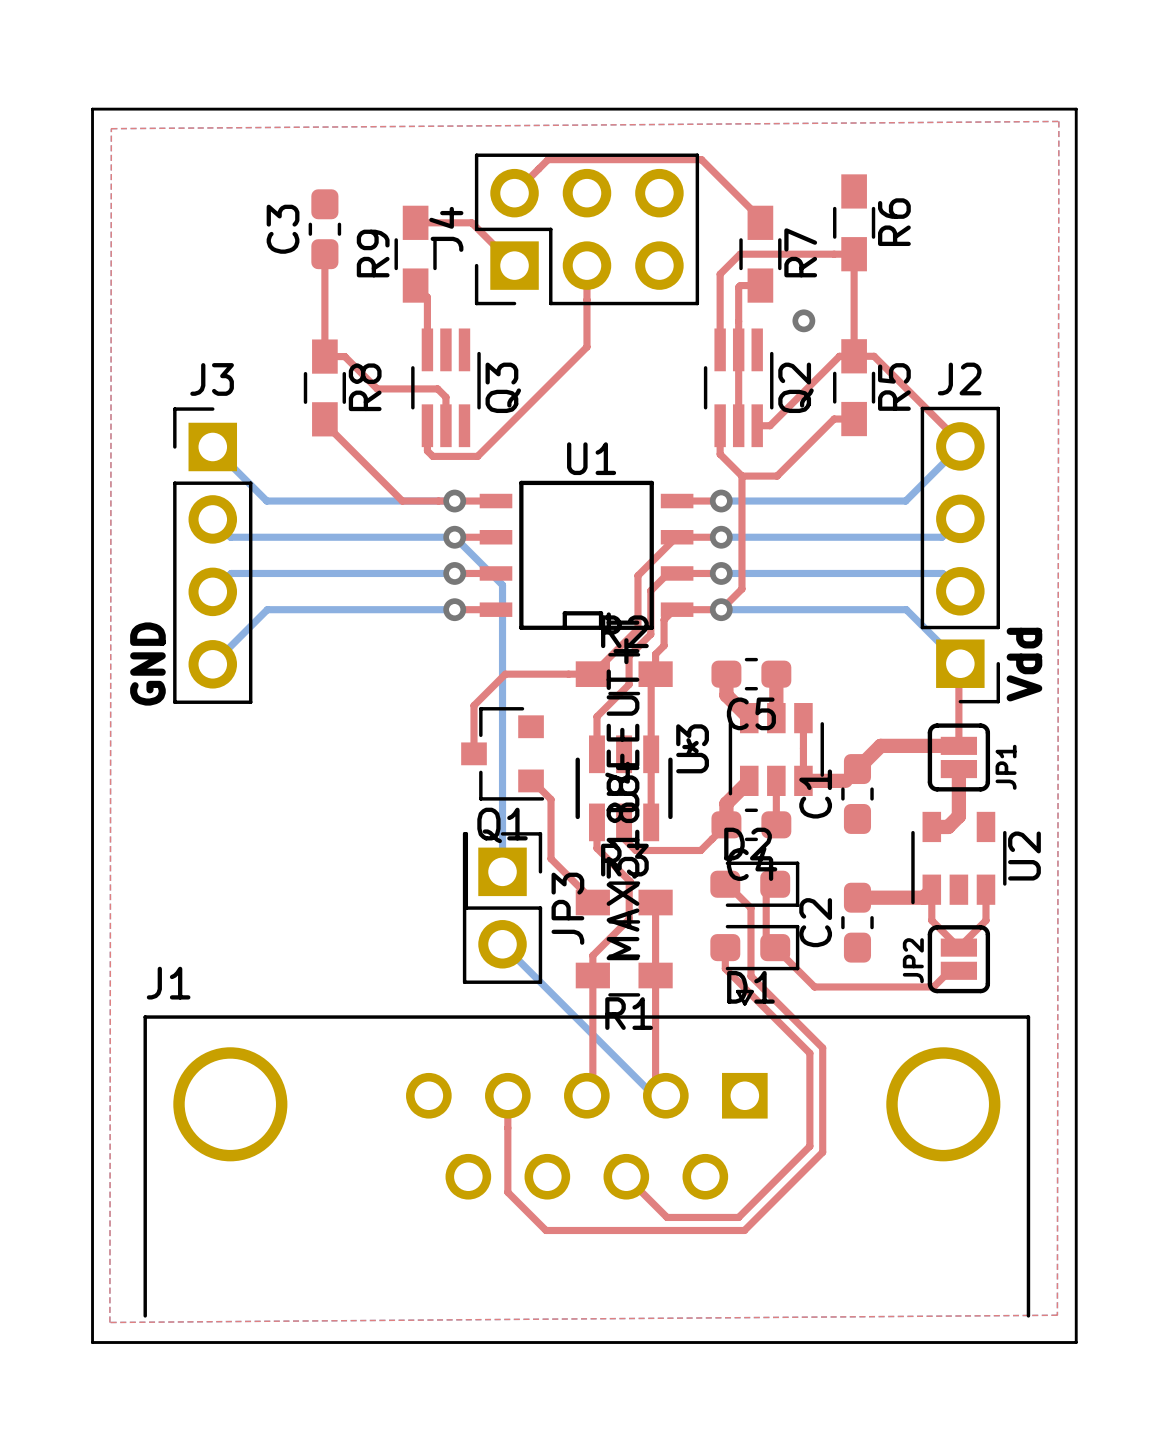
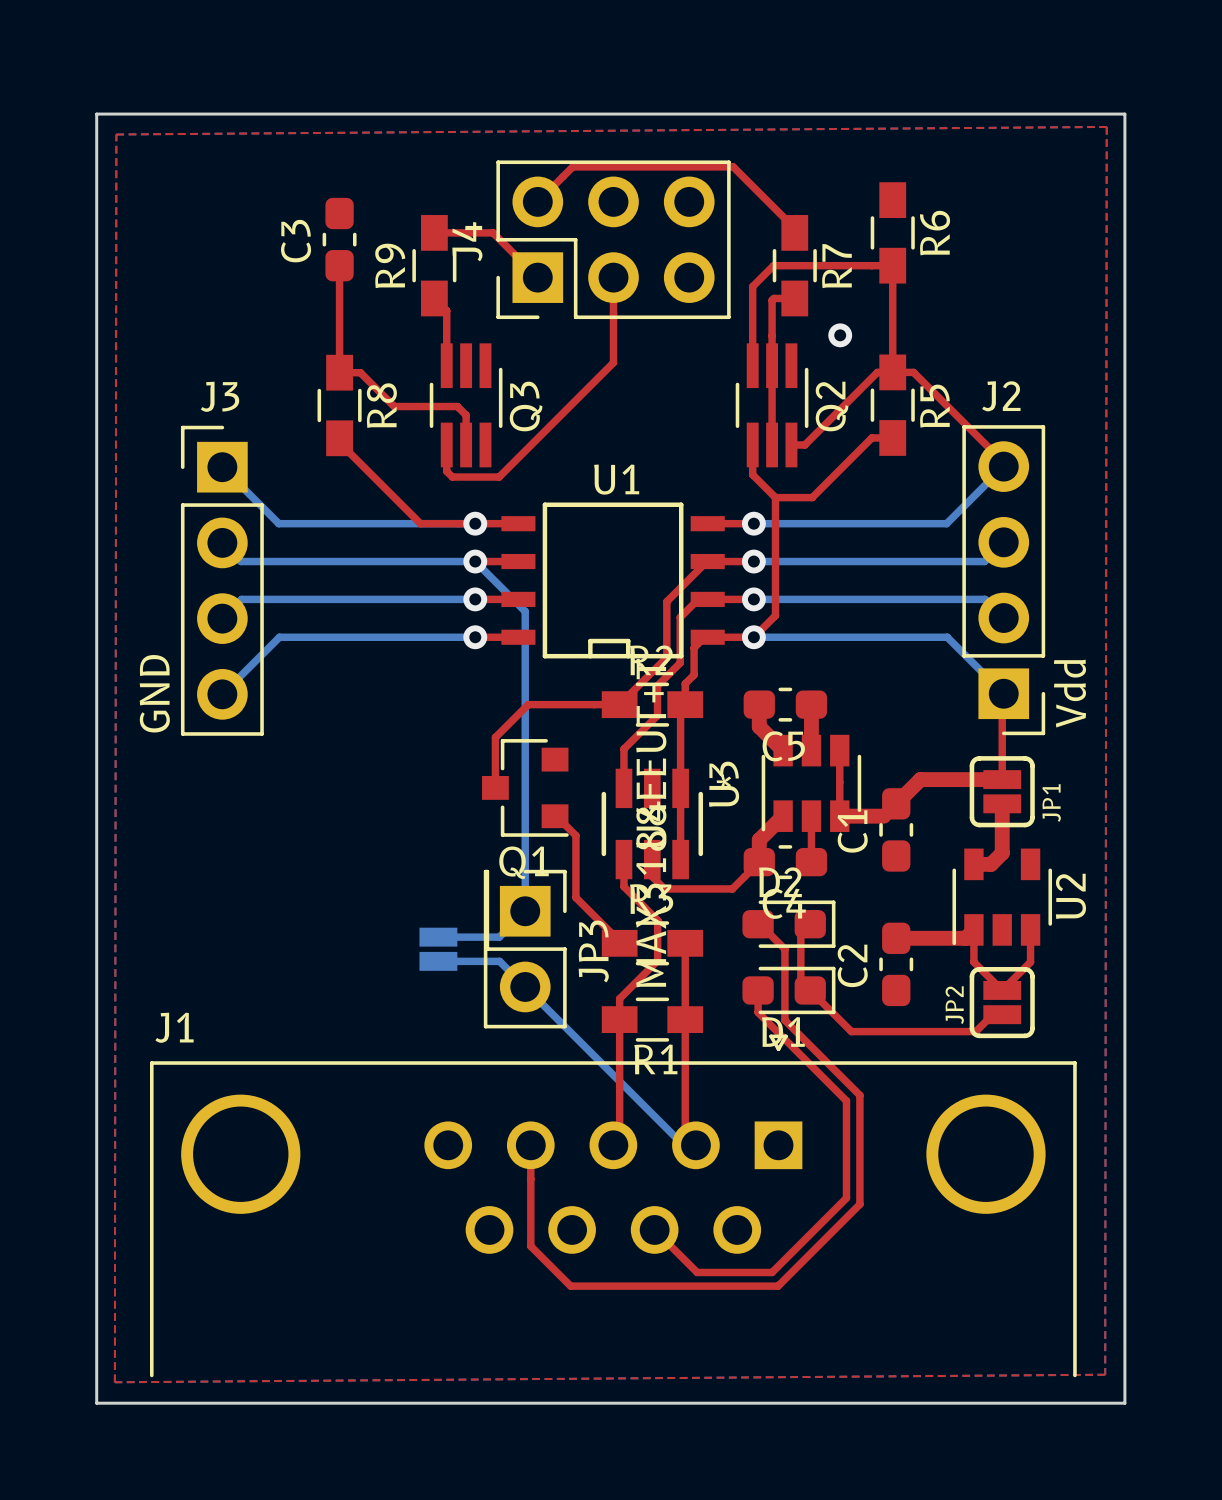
bottom track: none -> (525, 911) (499, 937) (438, 937)
part: none -> (438, 949)
bottom track: none -> (438, 961) (499, 961) (525, 986)

